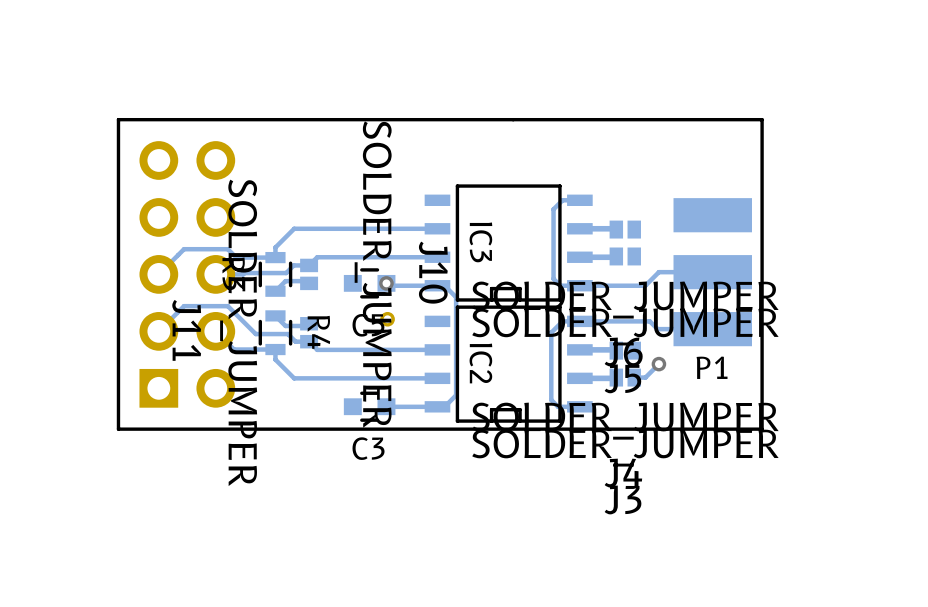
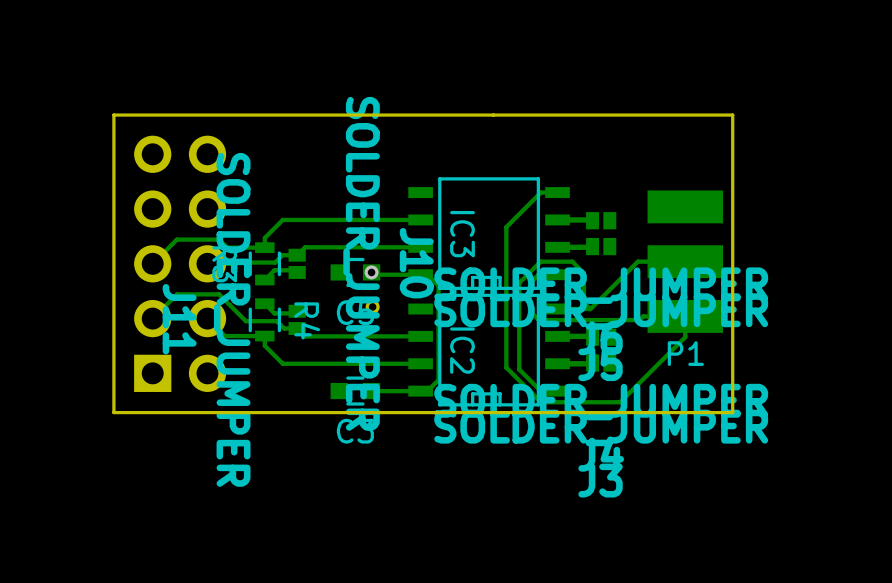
track: (553, 209) (553, 278) (560, 285) -> (532, 201) (506, 227) (506, 367) (541, 402) (620, 402) (685, 337) (685, 316)
track: (663, 272) (658, 272) (645, 285) (579, 285) -> none
track: (579, 321) (562, 321) (551, 332) (551, 399) (558, 406) (562, 406) -> (637, 261) (590, 309) (583, 302) (583, 273) (572, 261) (540, 261) (519, 283) (519, 369) (540, 391)
track: (613, 321) (649, 321) (657, 329) (669, 329) -> (538, 274) (530, 283) (530, 311) (538, 320) (639, 320) (643, 316)
track: (658, 364) (645, 377) (634, 377) -> none
via: (658, 364) -> none

